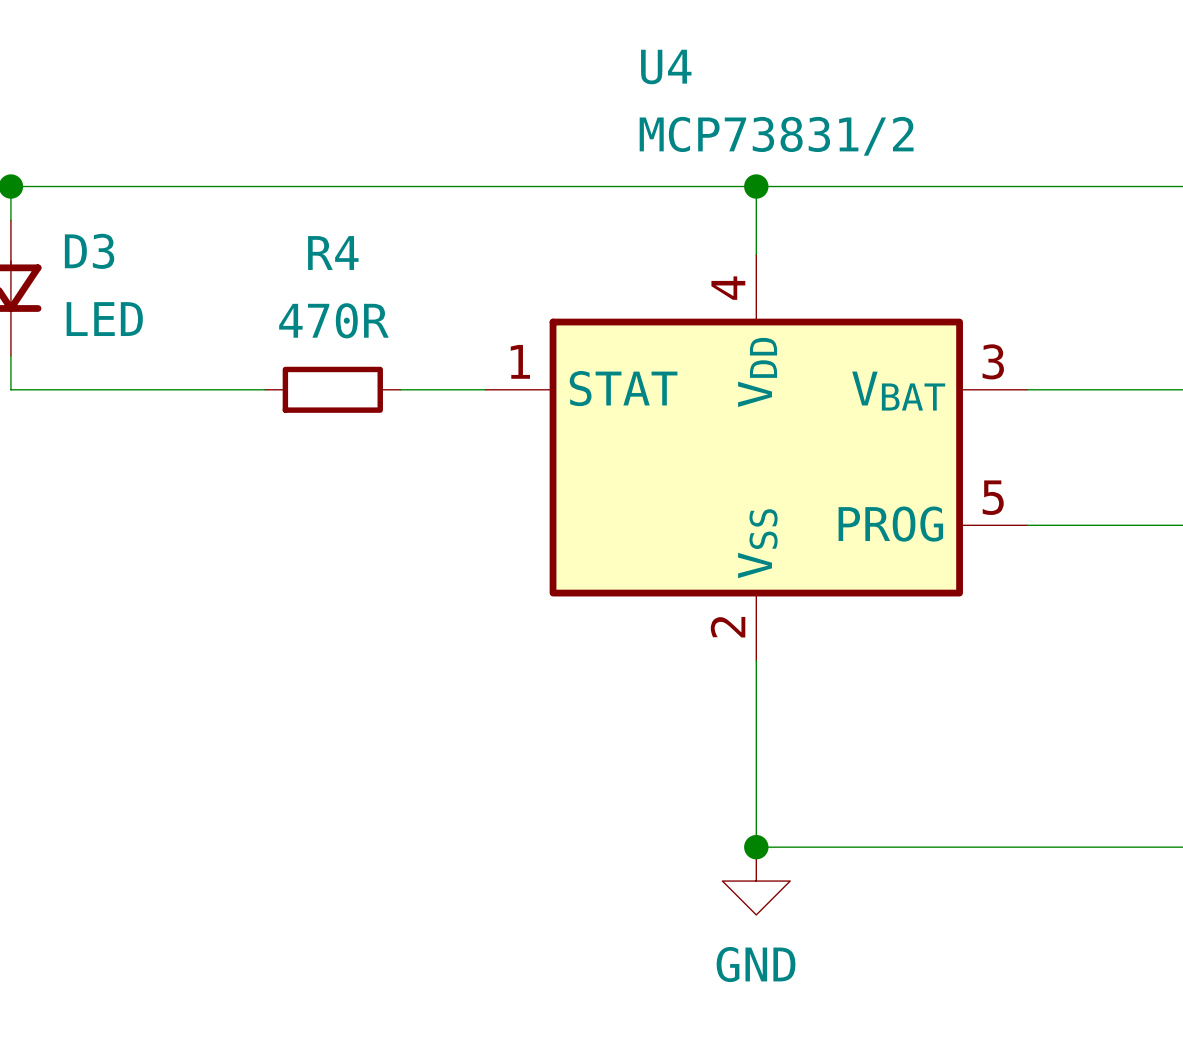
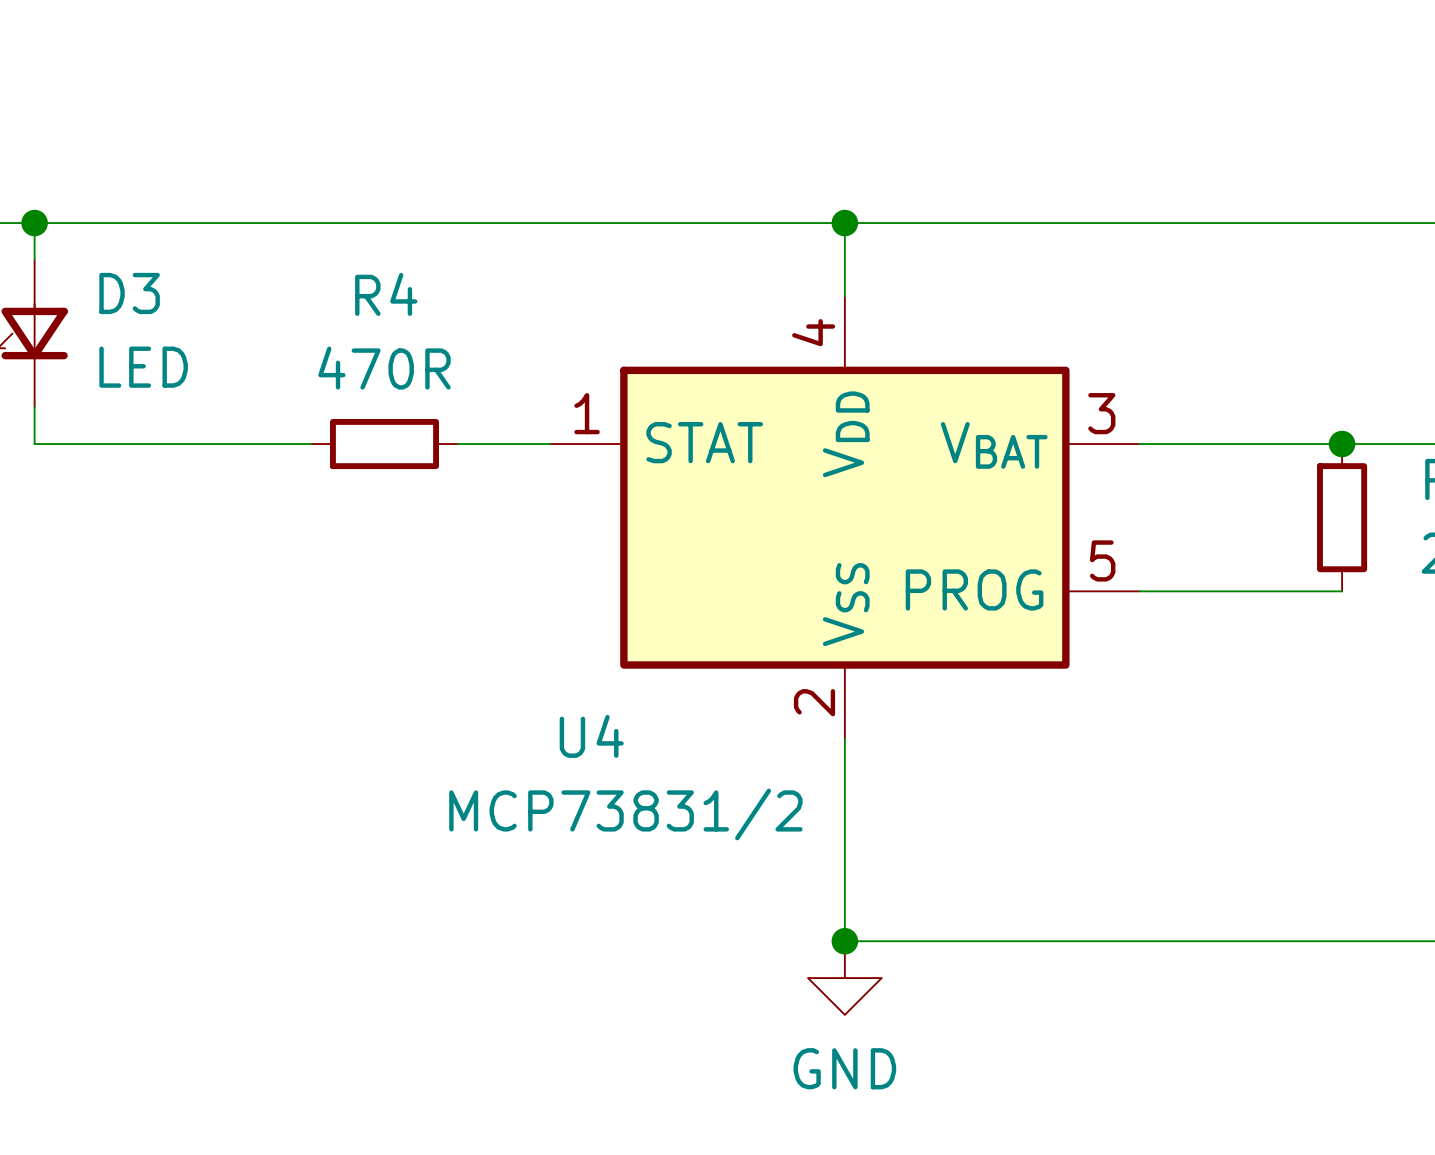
U4 name position: U4 (666, 67) -> U4 (591, 736)
U4 value position: MCP73831/2 (776, 136) -> MCP73831/2 (625, 814)

